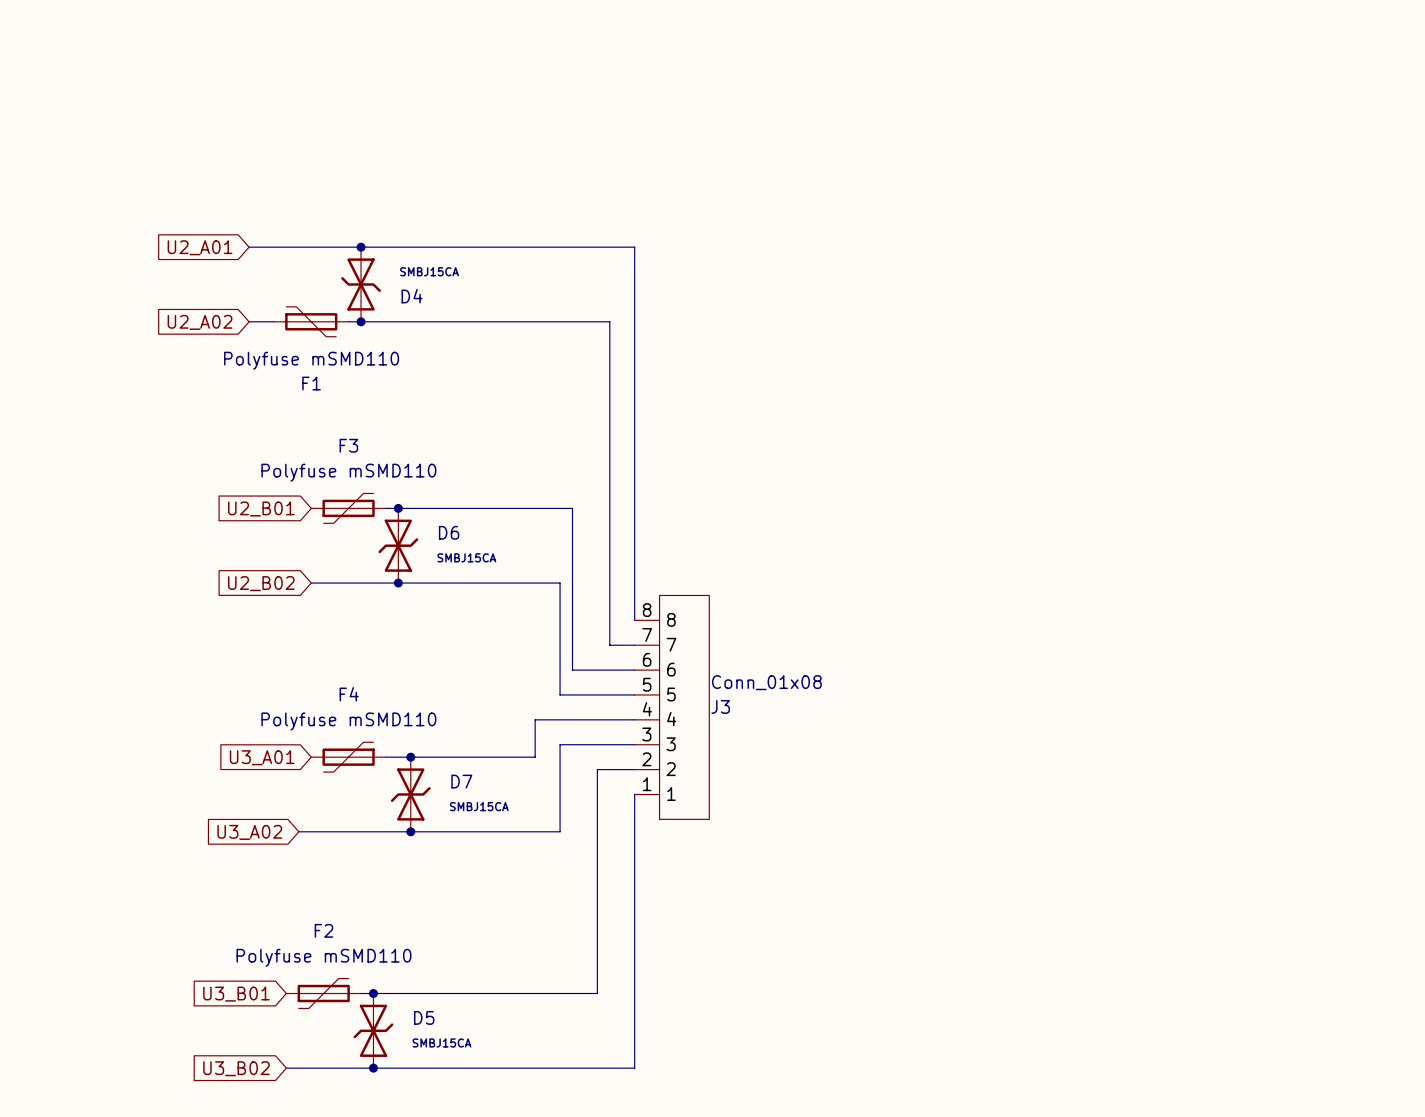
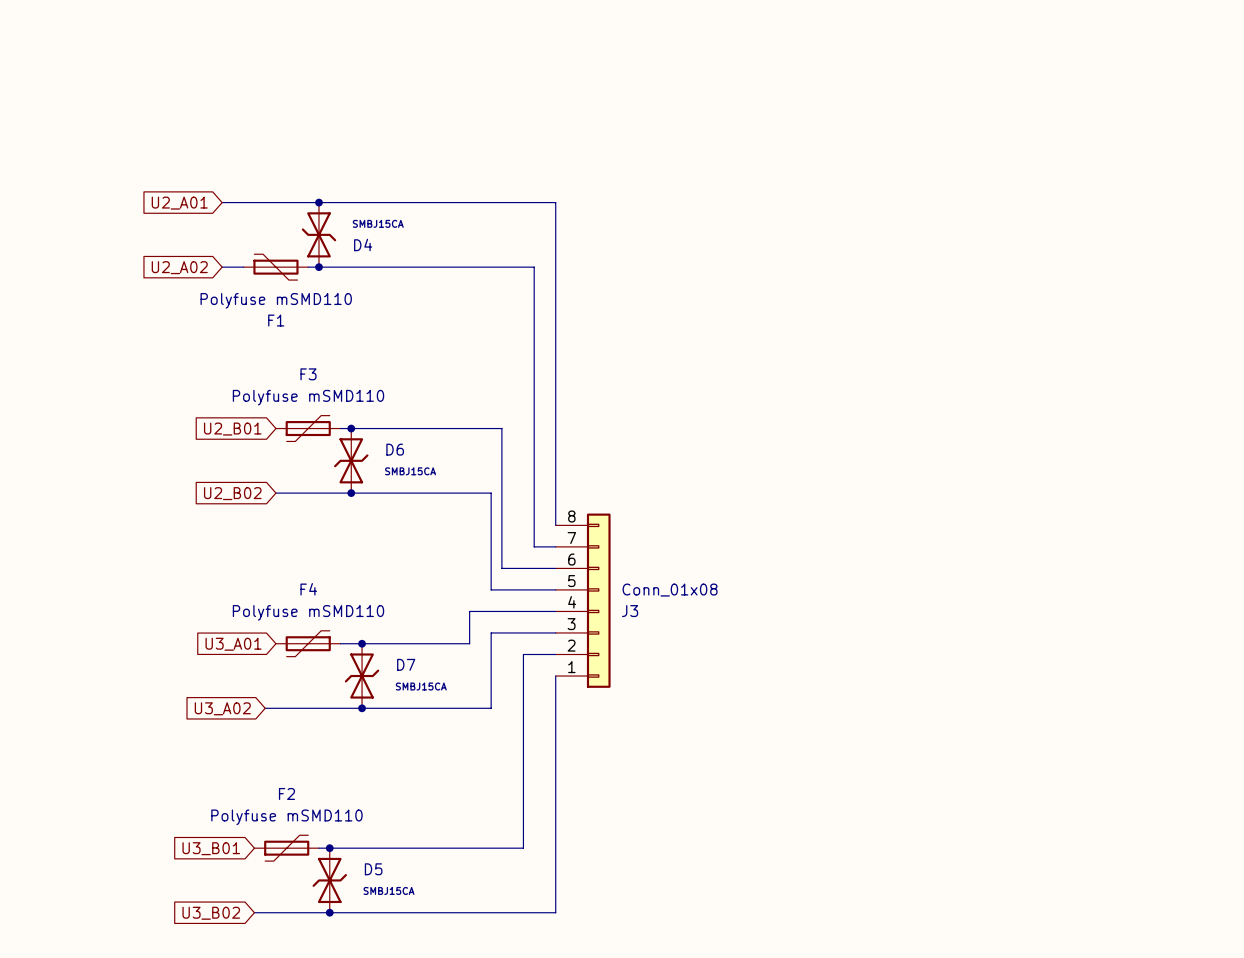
J3 symbol: [634, 595, 710, 820] -> [555, 513, 611, 688]

